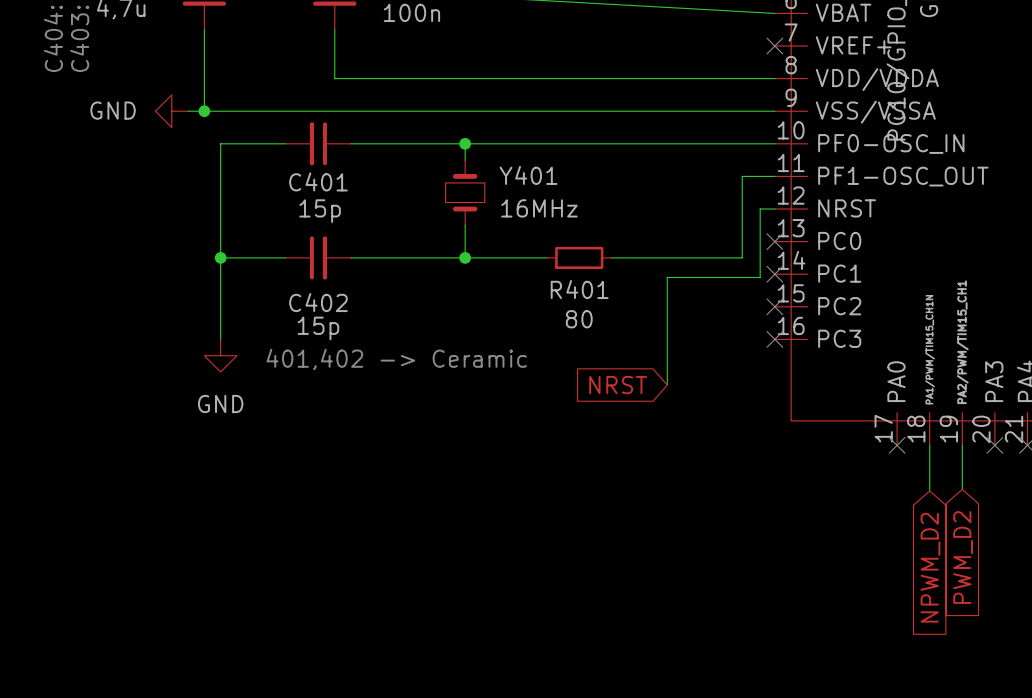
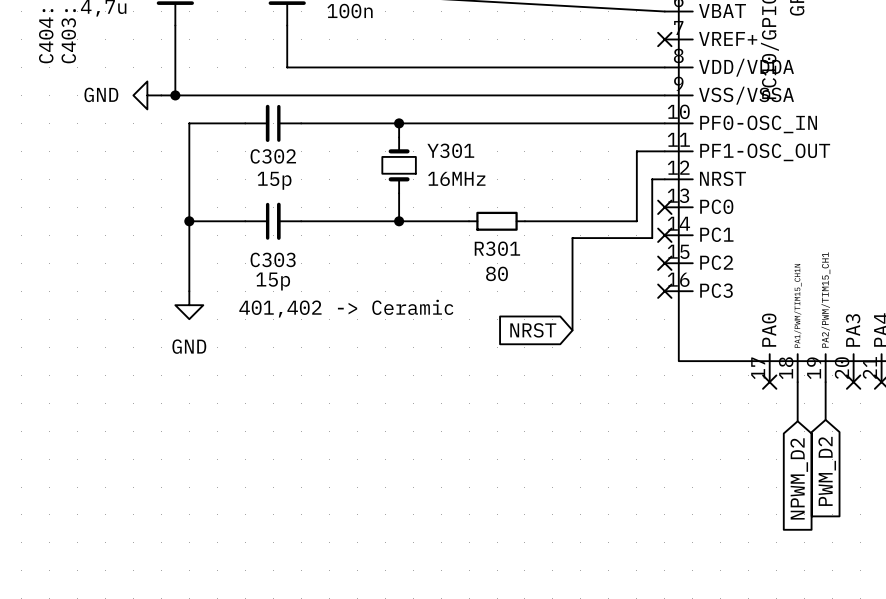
Y401 name: Y401 (528, 175) -> Y301 (450, 150)
C401 name: C401 (318, 181) -> C302 (273, 156)
R401 name: R401 (579, 289) -> R301 (497, 248)
C402 name: C402 (318, 302) -> C303 (273, 259)

